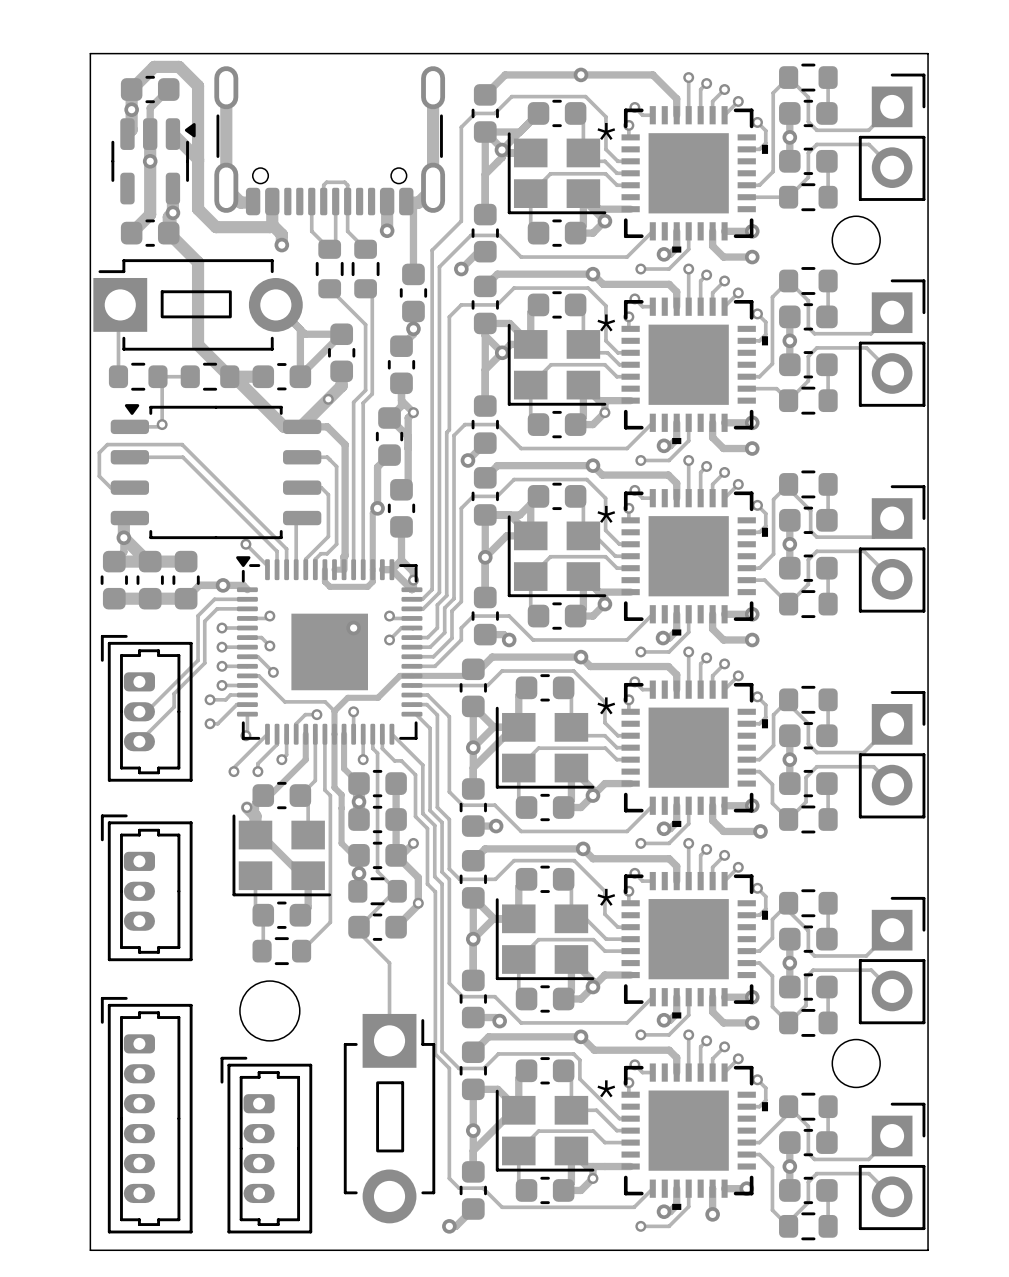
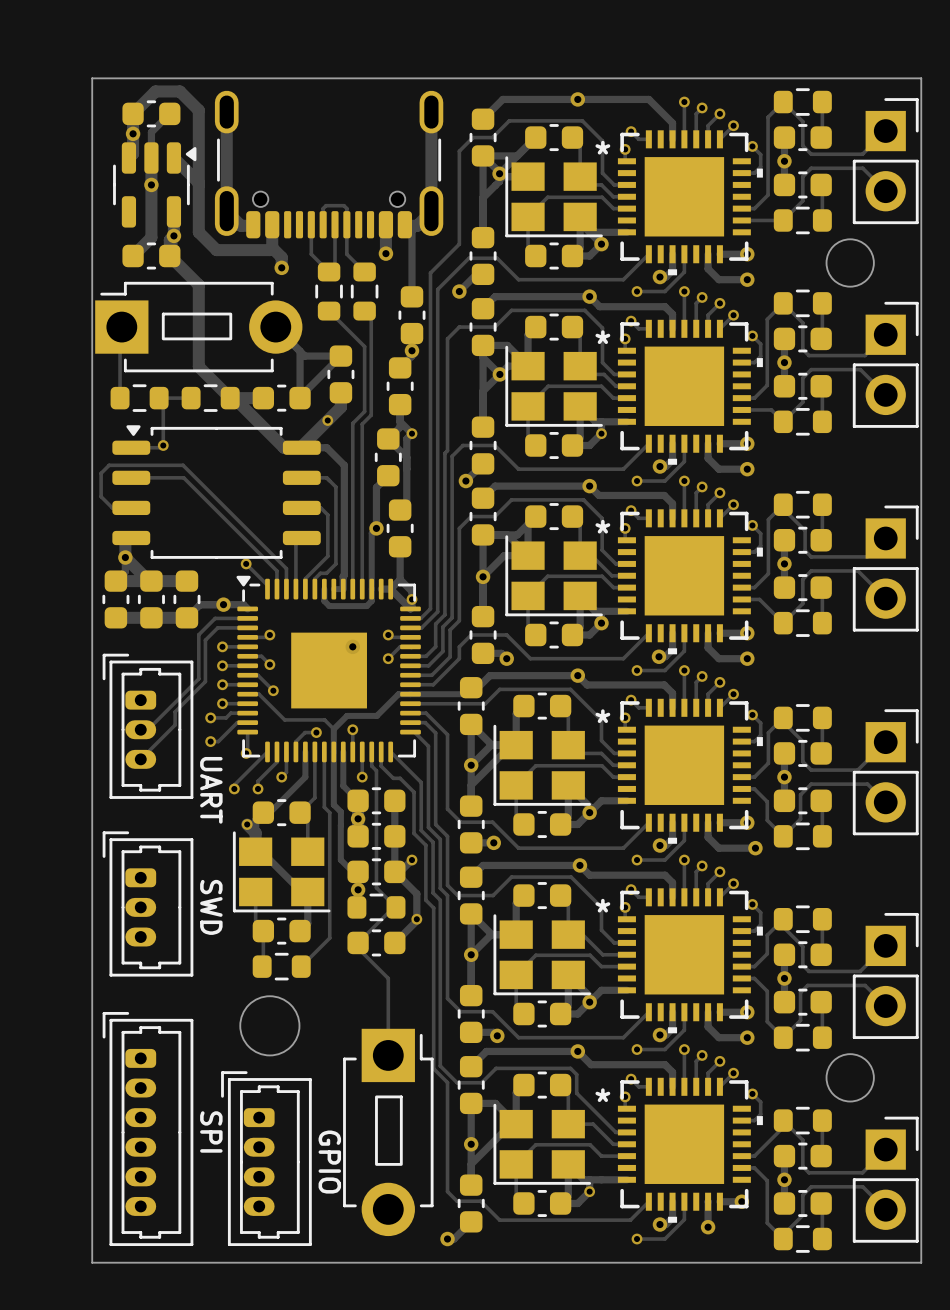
text: none -> UART (211, 790)
text: none -> SWD (211, 907)
text: none -> SPI (211, 1131)
text: none -> GPIO (329, 1162)

